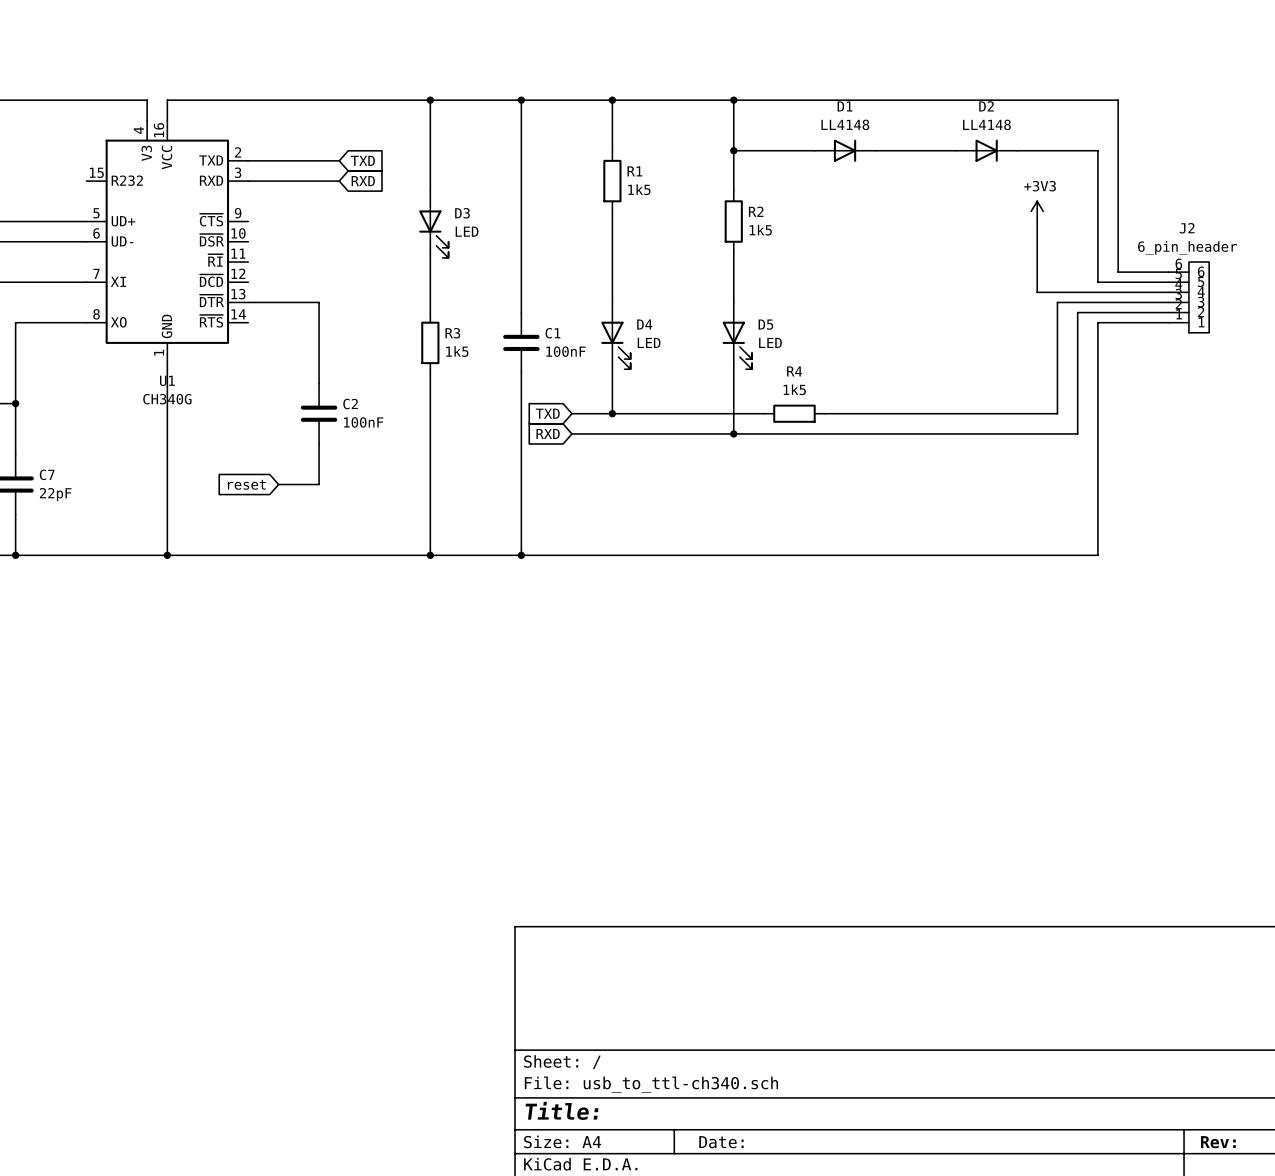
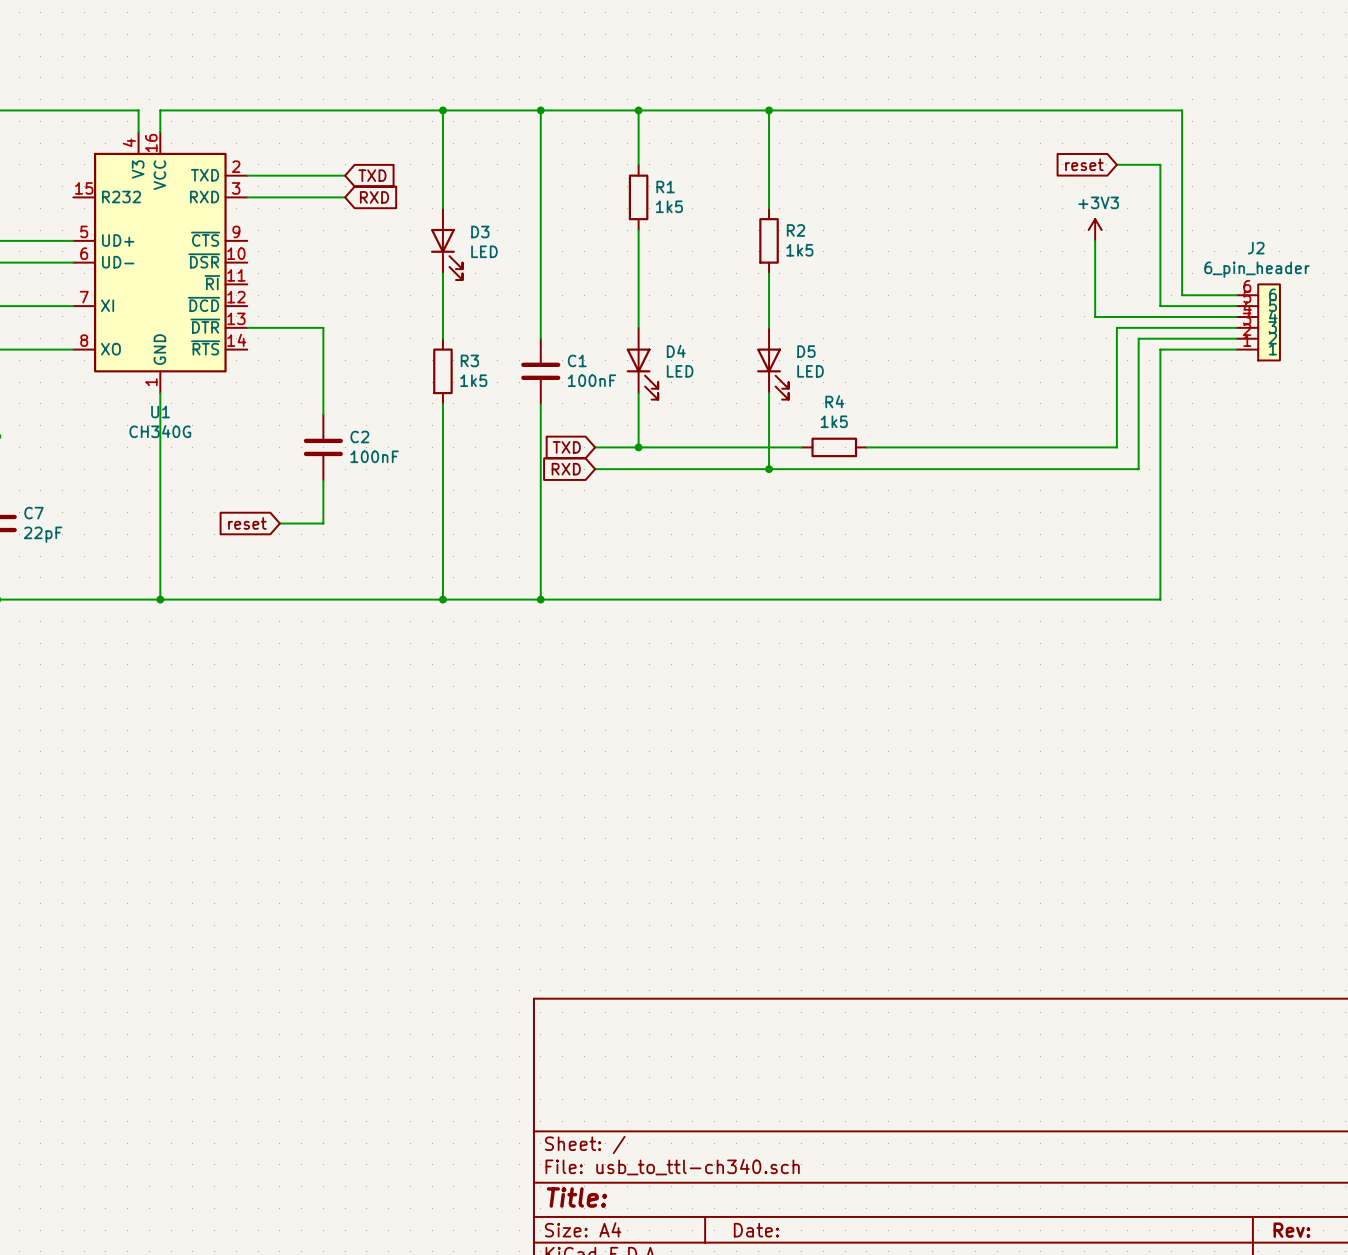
wire: (733, 150) (814, 150) -> none
junction: (733, 150) -> none
D1: LL4148 (845, 150) -> none
wire: (875, 150) (956, 150) -> none
D2: LL4148 (986, 150) -> none
wire: (1016, 150) (1057, 150) -> none
global label: none -> reset (1084, 164)

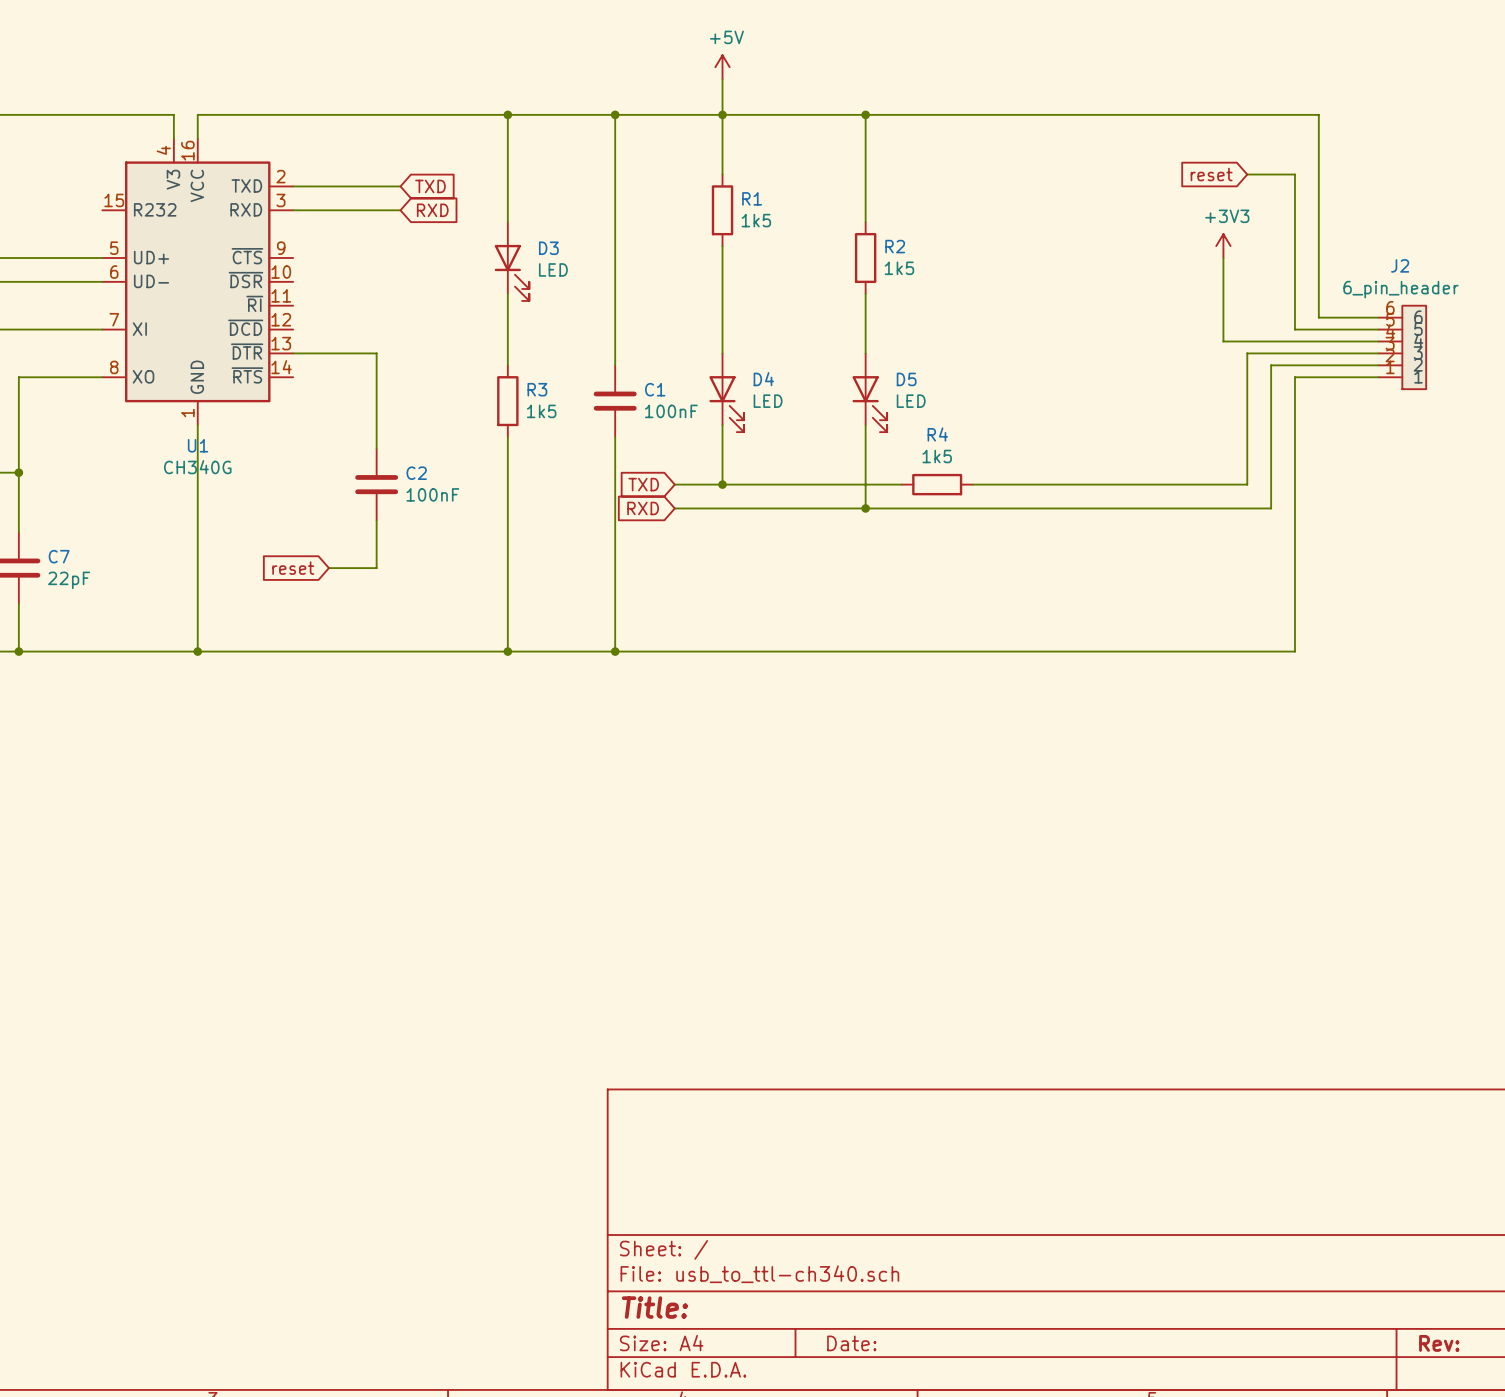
power symbol: none -> +5V (722, 67)
wire: none -> (722, 79) (722, 114)

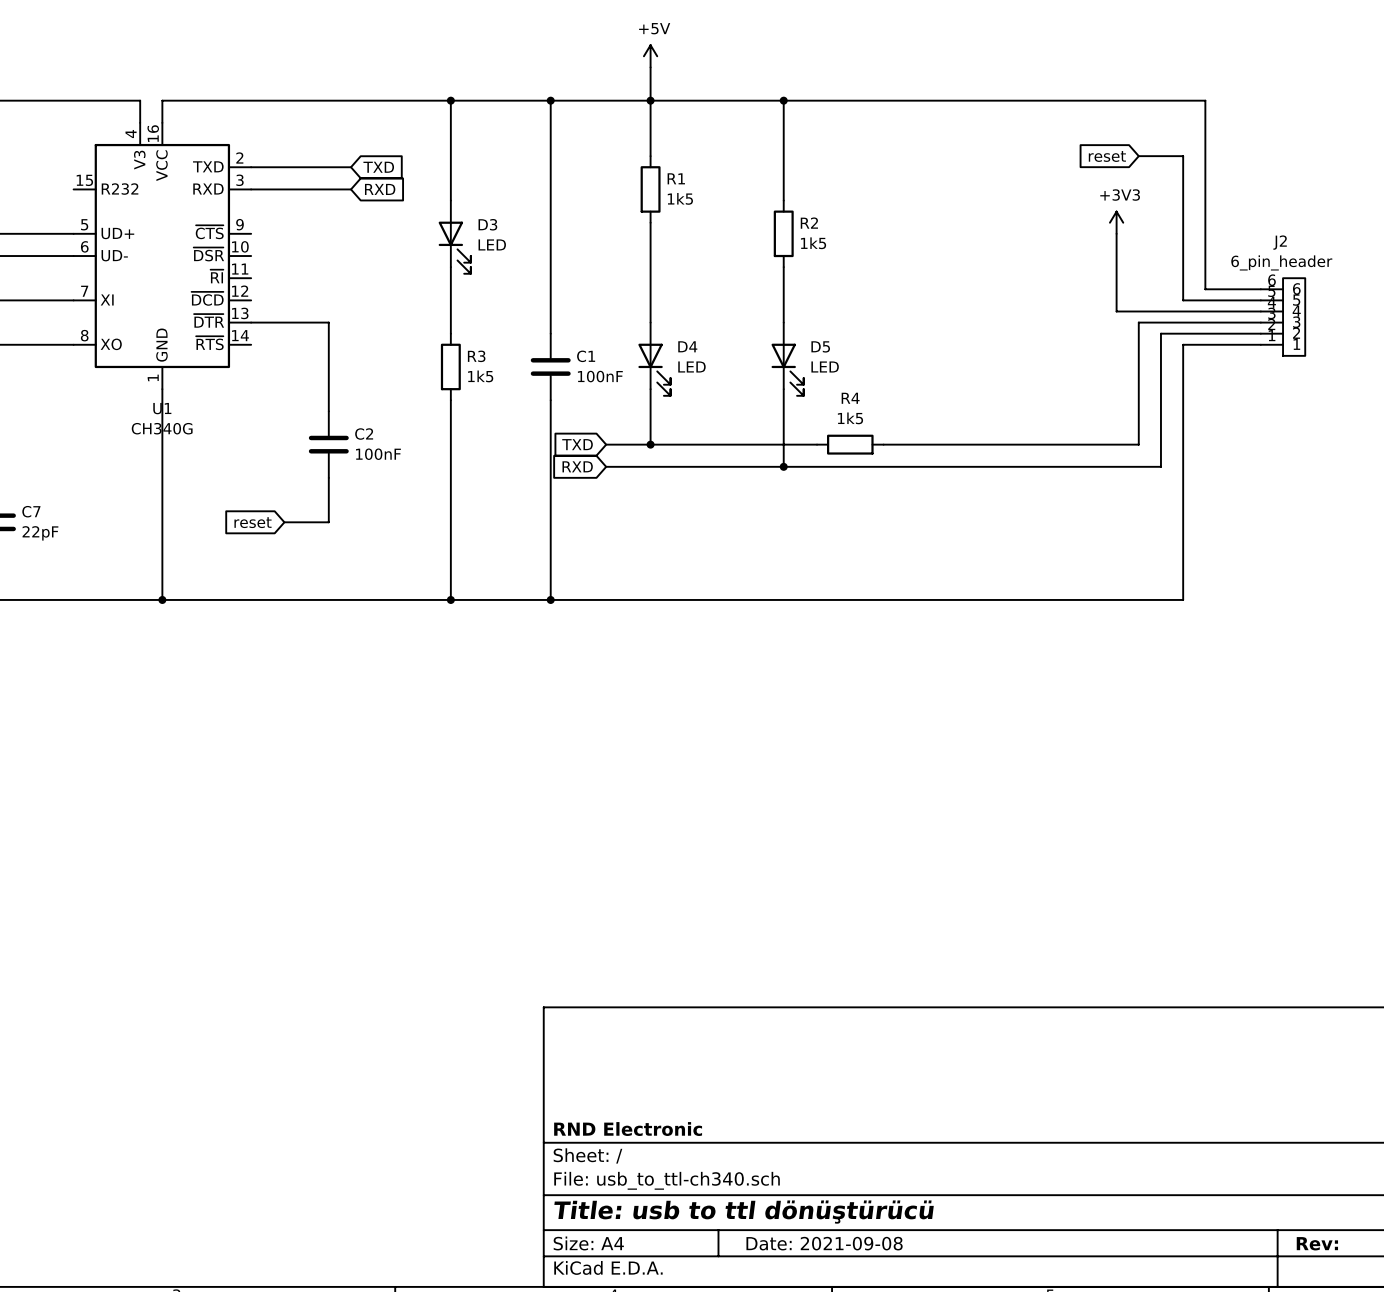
title block: none -> RND Electronic (628, 1129)
title block: Title: (654, 1307) -> Title: usb to ttl dönüştürücü (744, 1212)
title block: Date: (851, 1343) -> Date: 2021-09-08 (824, 1243)

